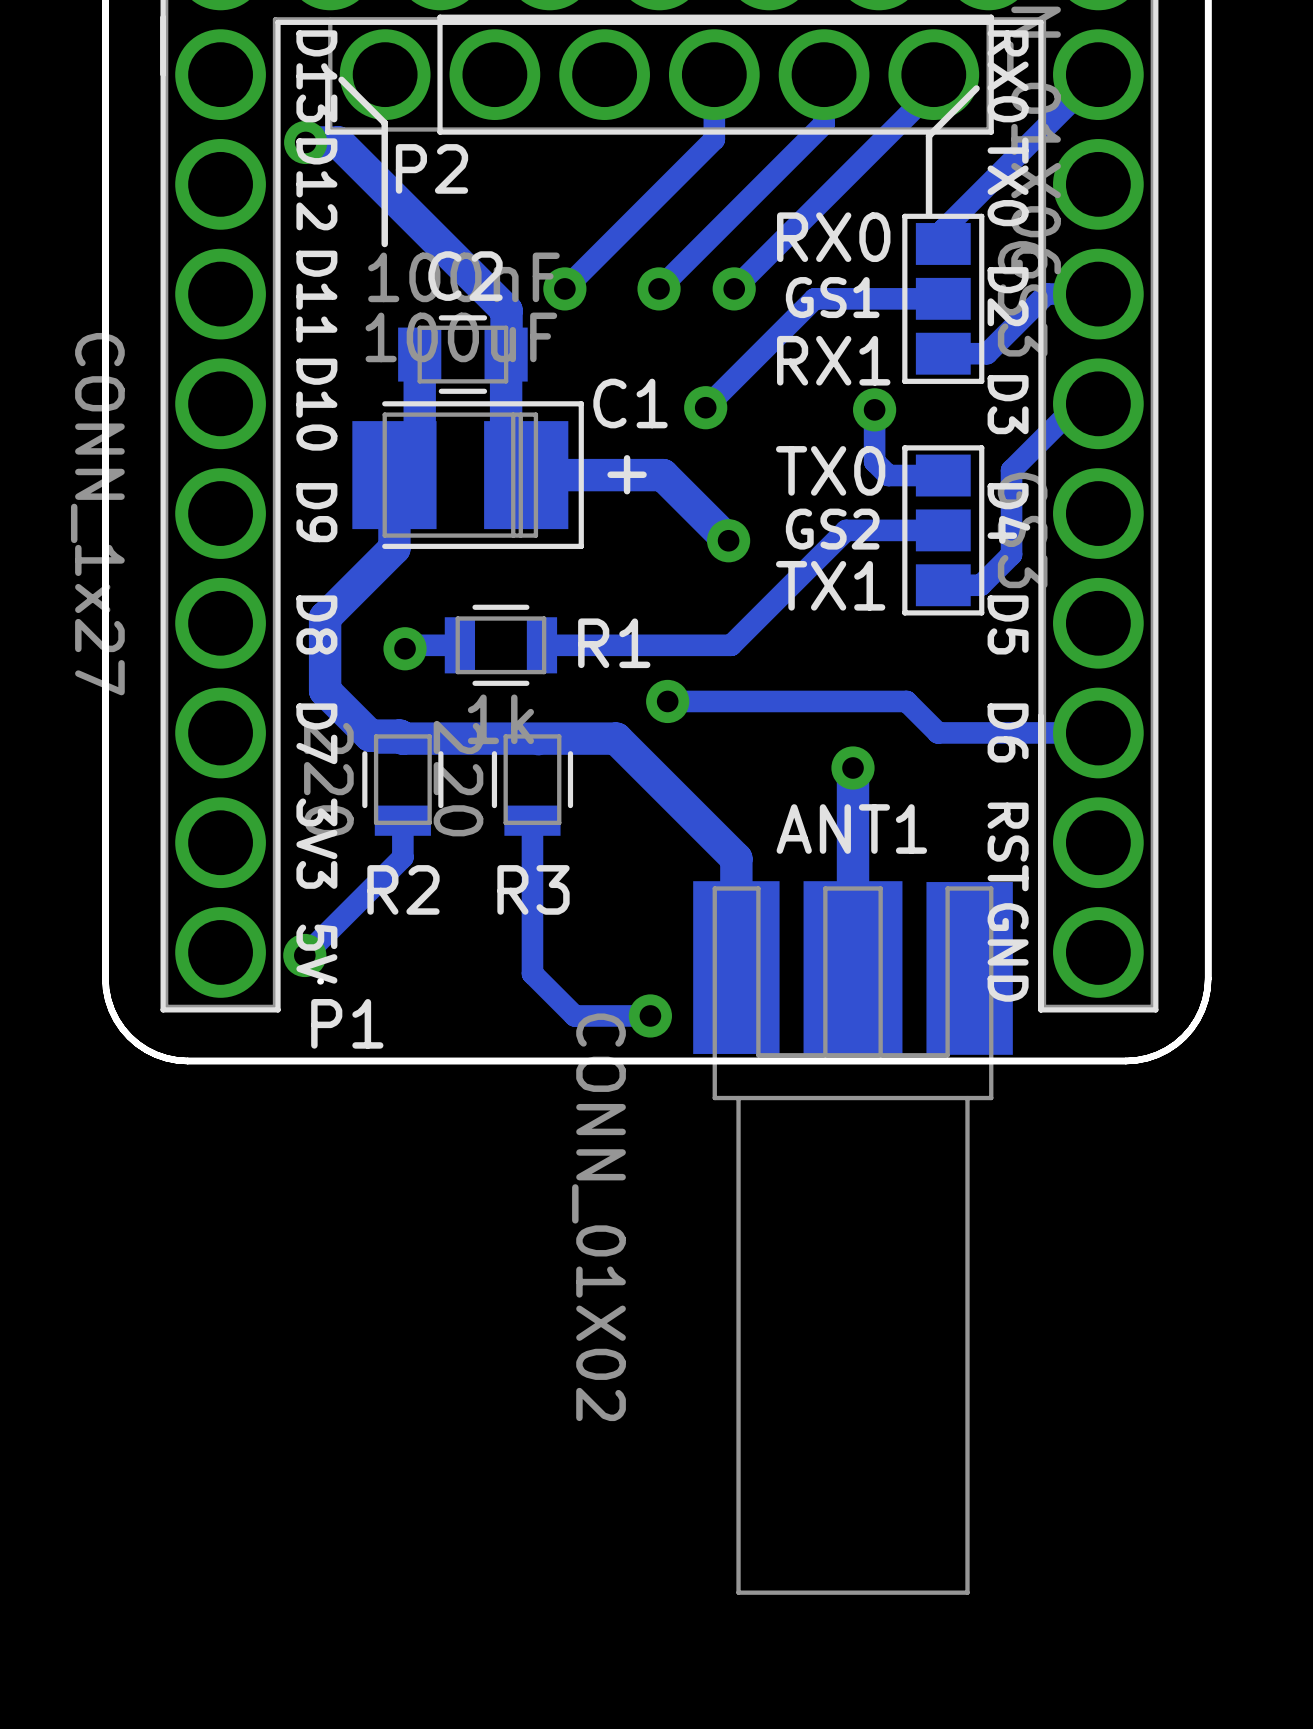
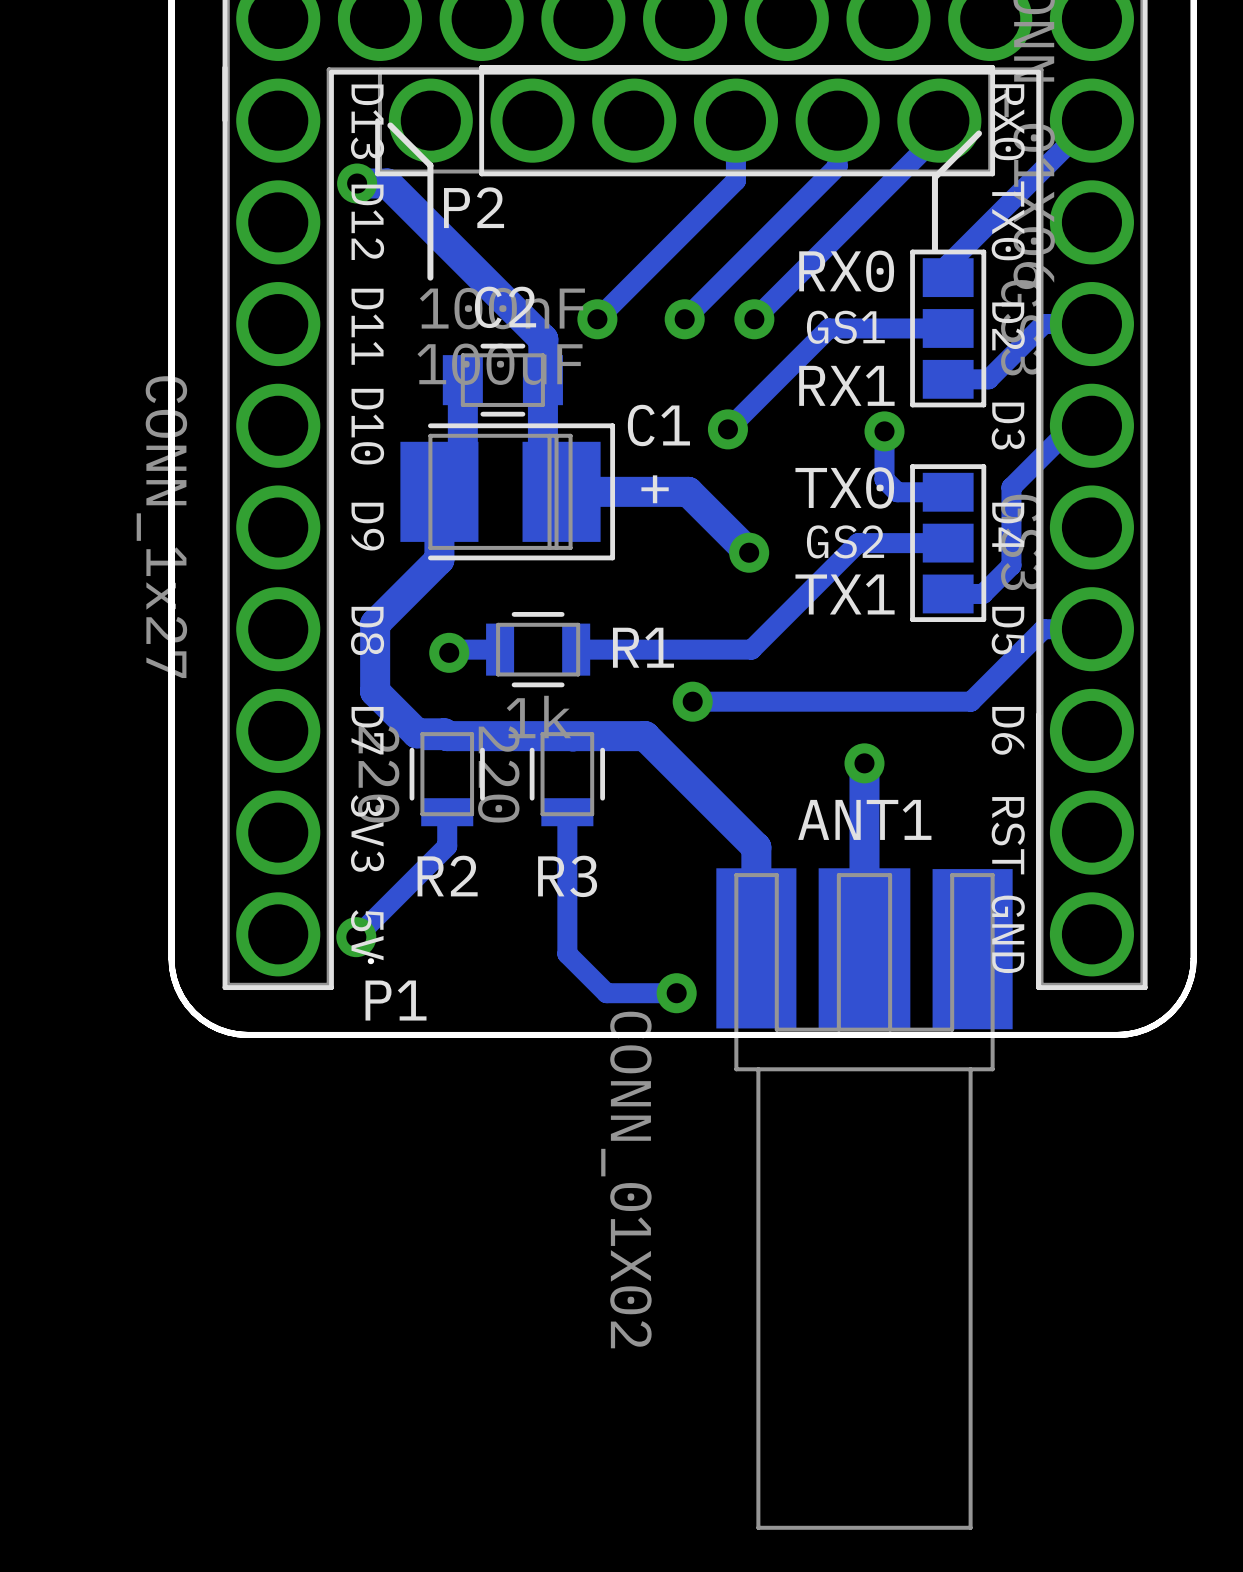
track: (906, 701) (938, 732) (1098, 732) -> (914, 701) (971, 701) (1043, 629) (1091, 629)

